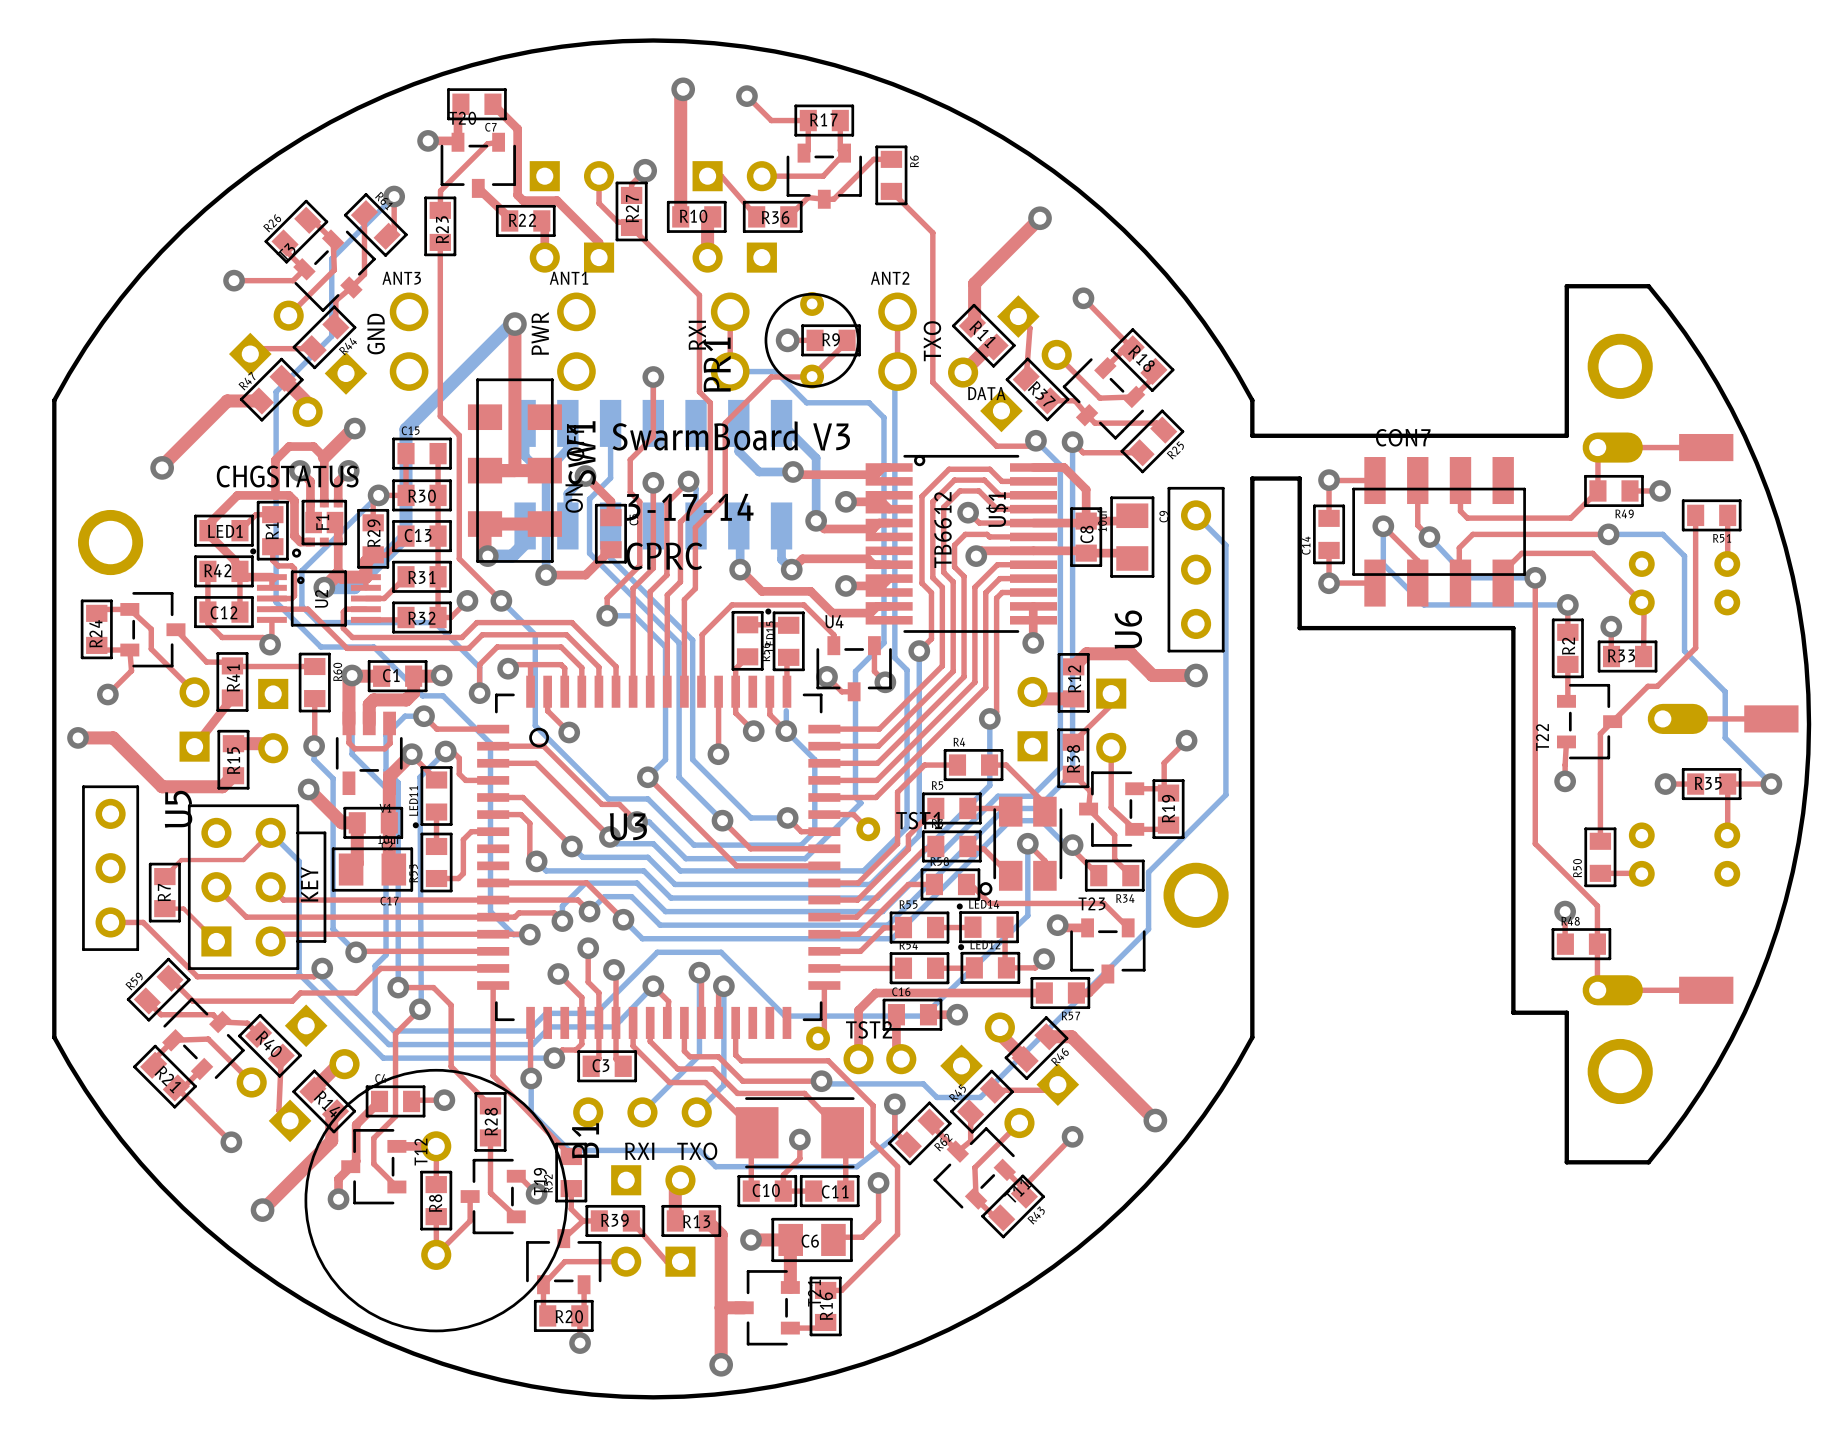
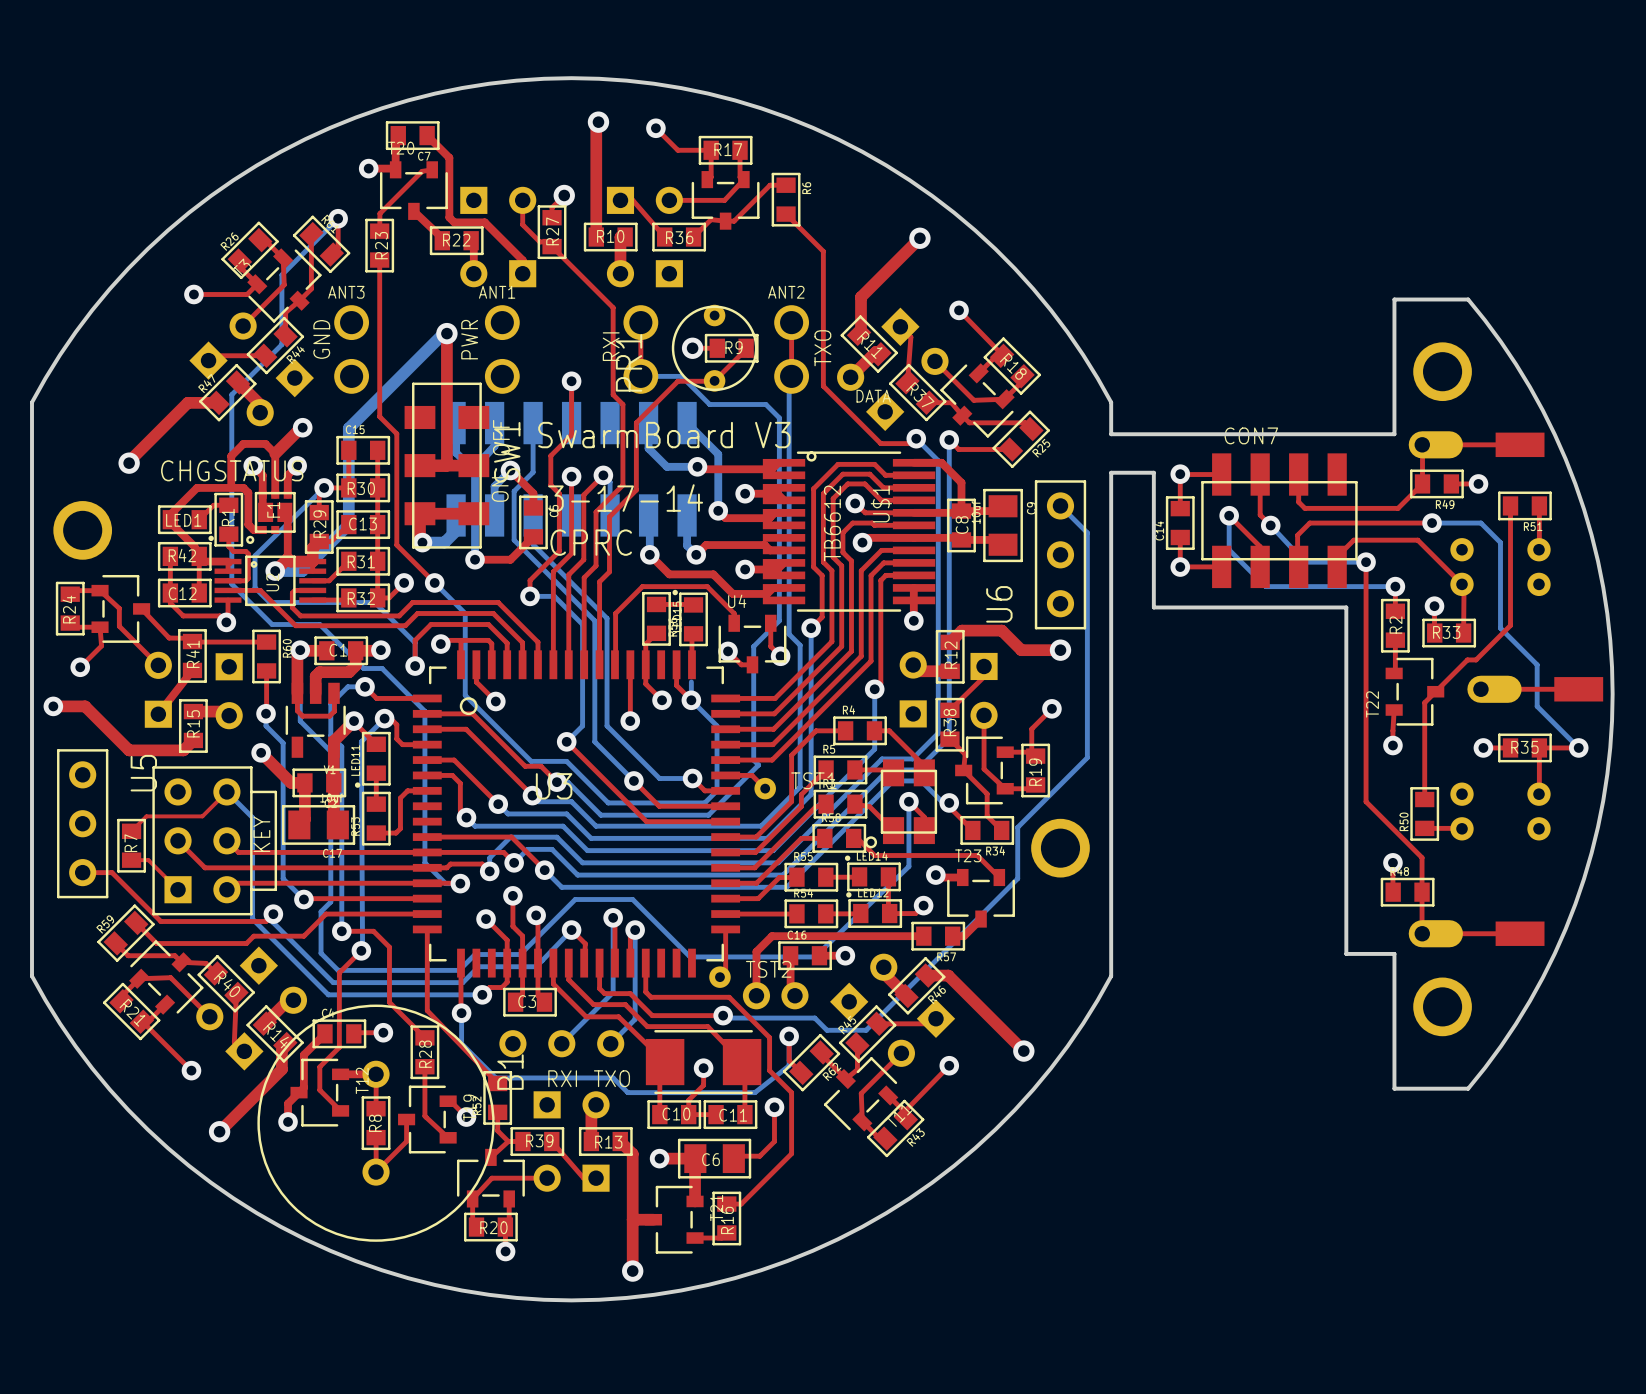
part footprint: [979, 796, 1063, 896] -> [864, 759, 938, 849]

